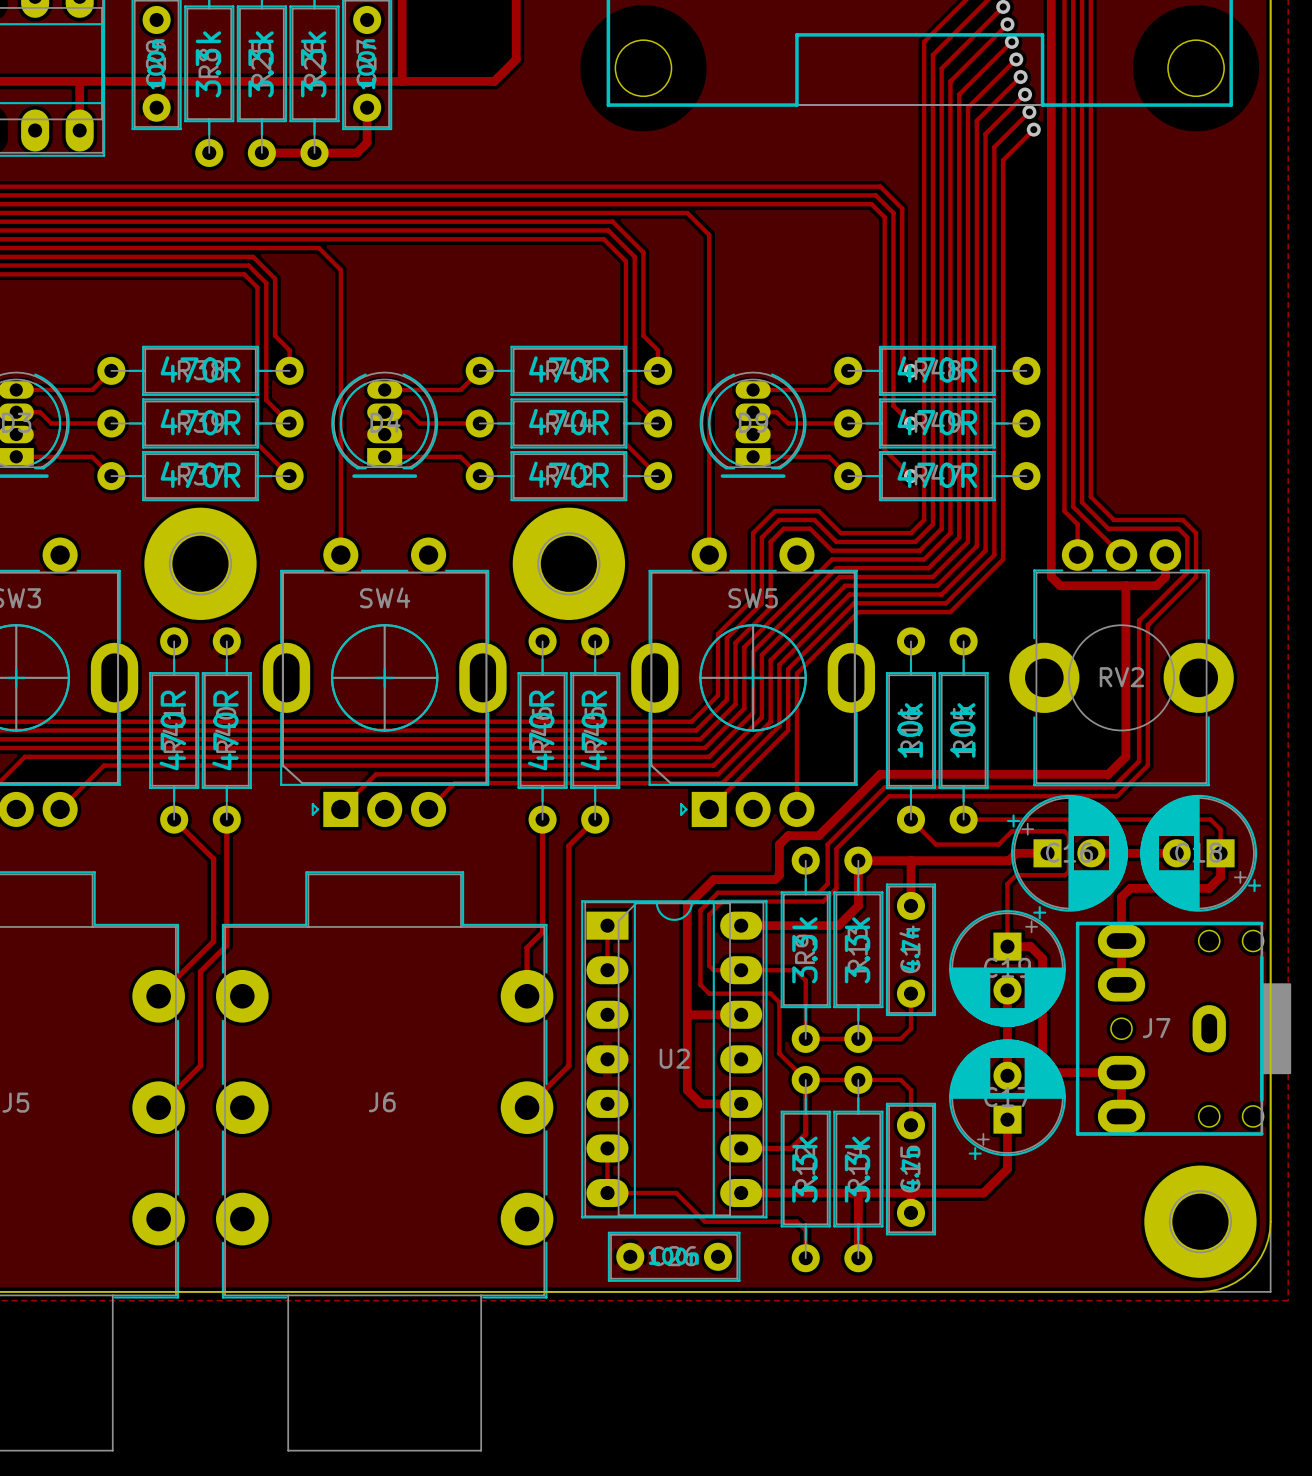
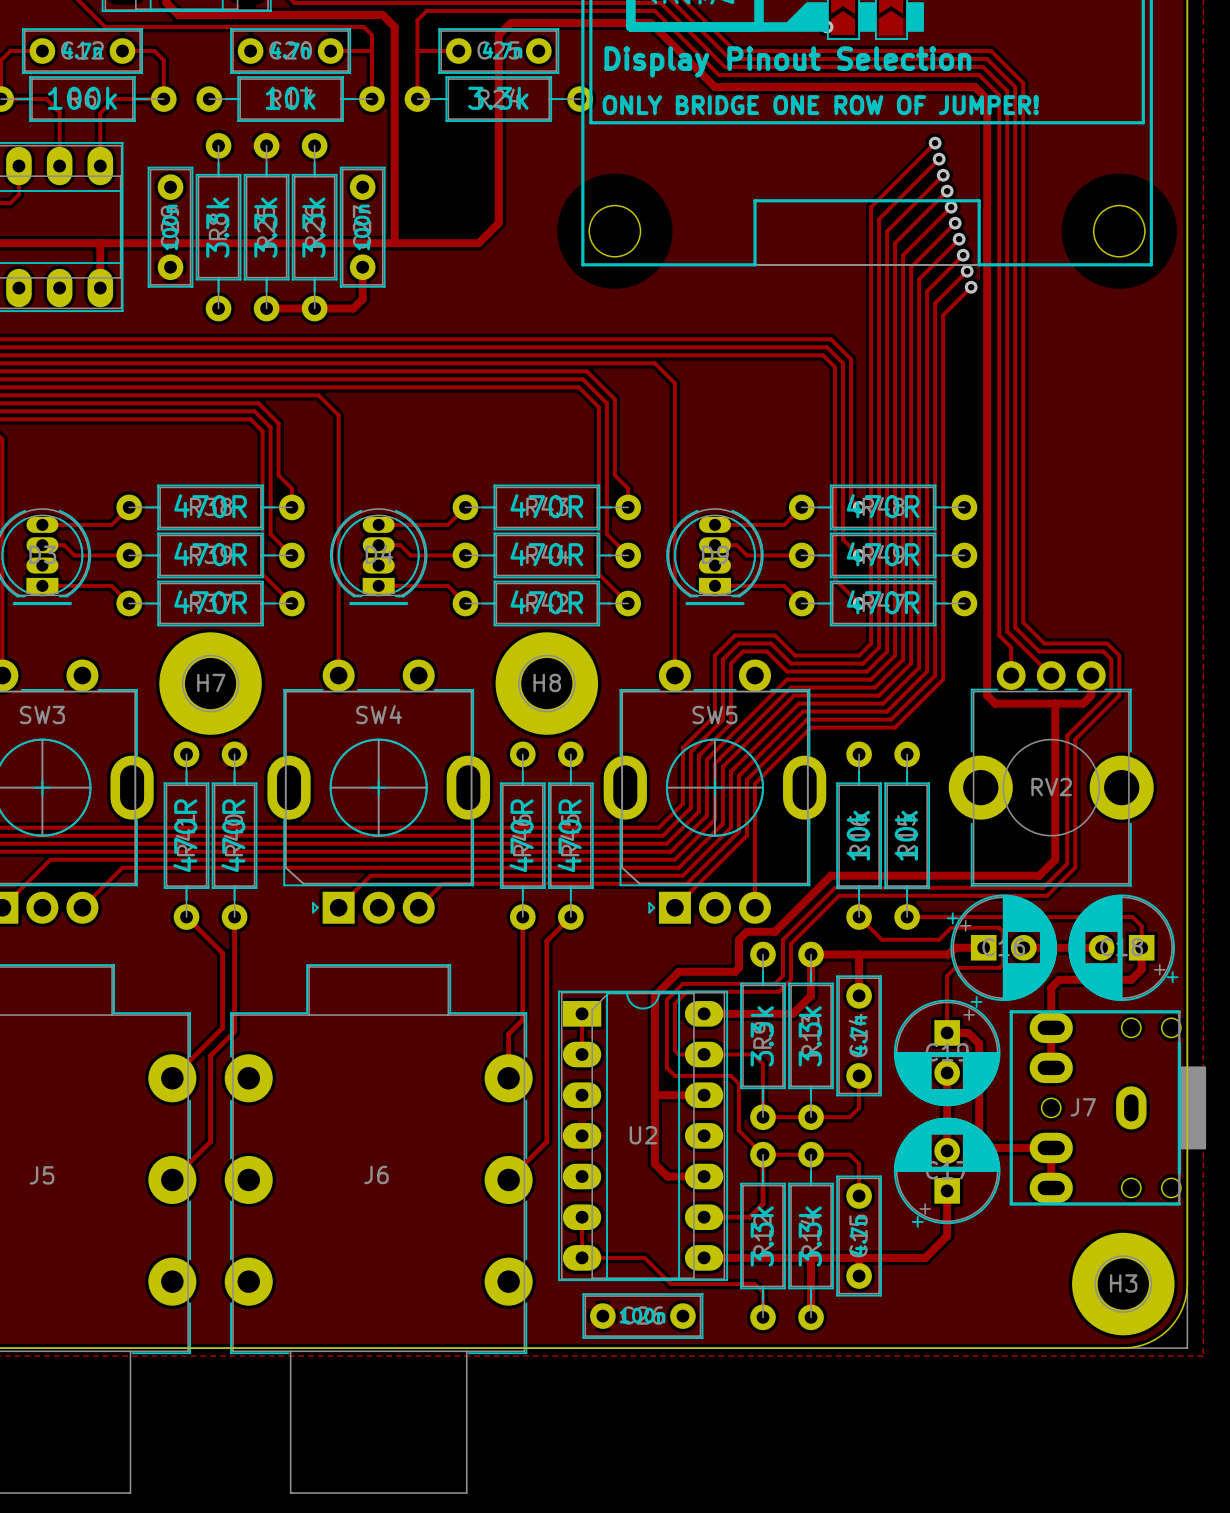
H7 name: none -> H7 (211, 682)
H8 name: none -> H8 (547, 682)
H3 name: none -> H3 (1123, 1283)

